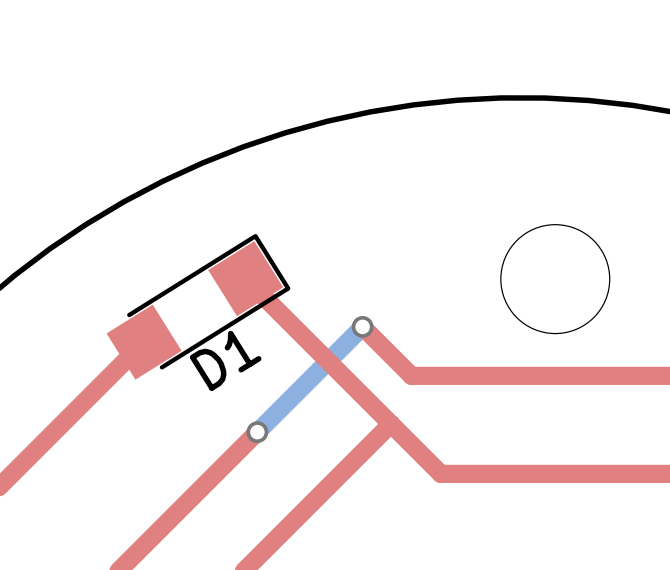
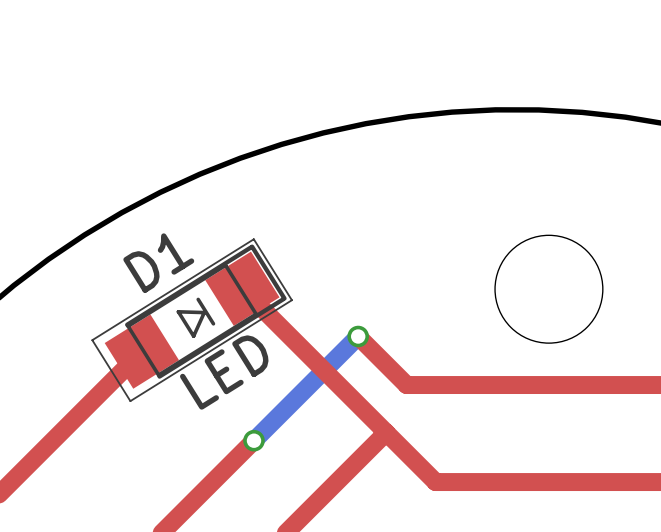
D1 footprint: [106, 233, 291, 380] -> [91, 238, 293, 403]
D1 name position: D1 (225, 360) -> D1 (158, 263)
D1 value: none -> LED (224, 372)

